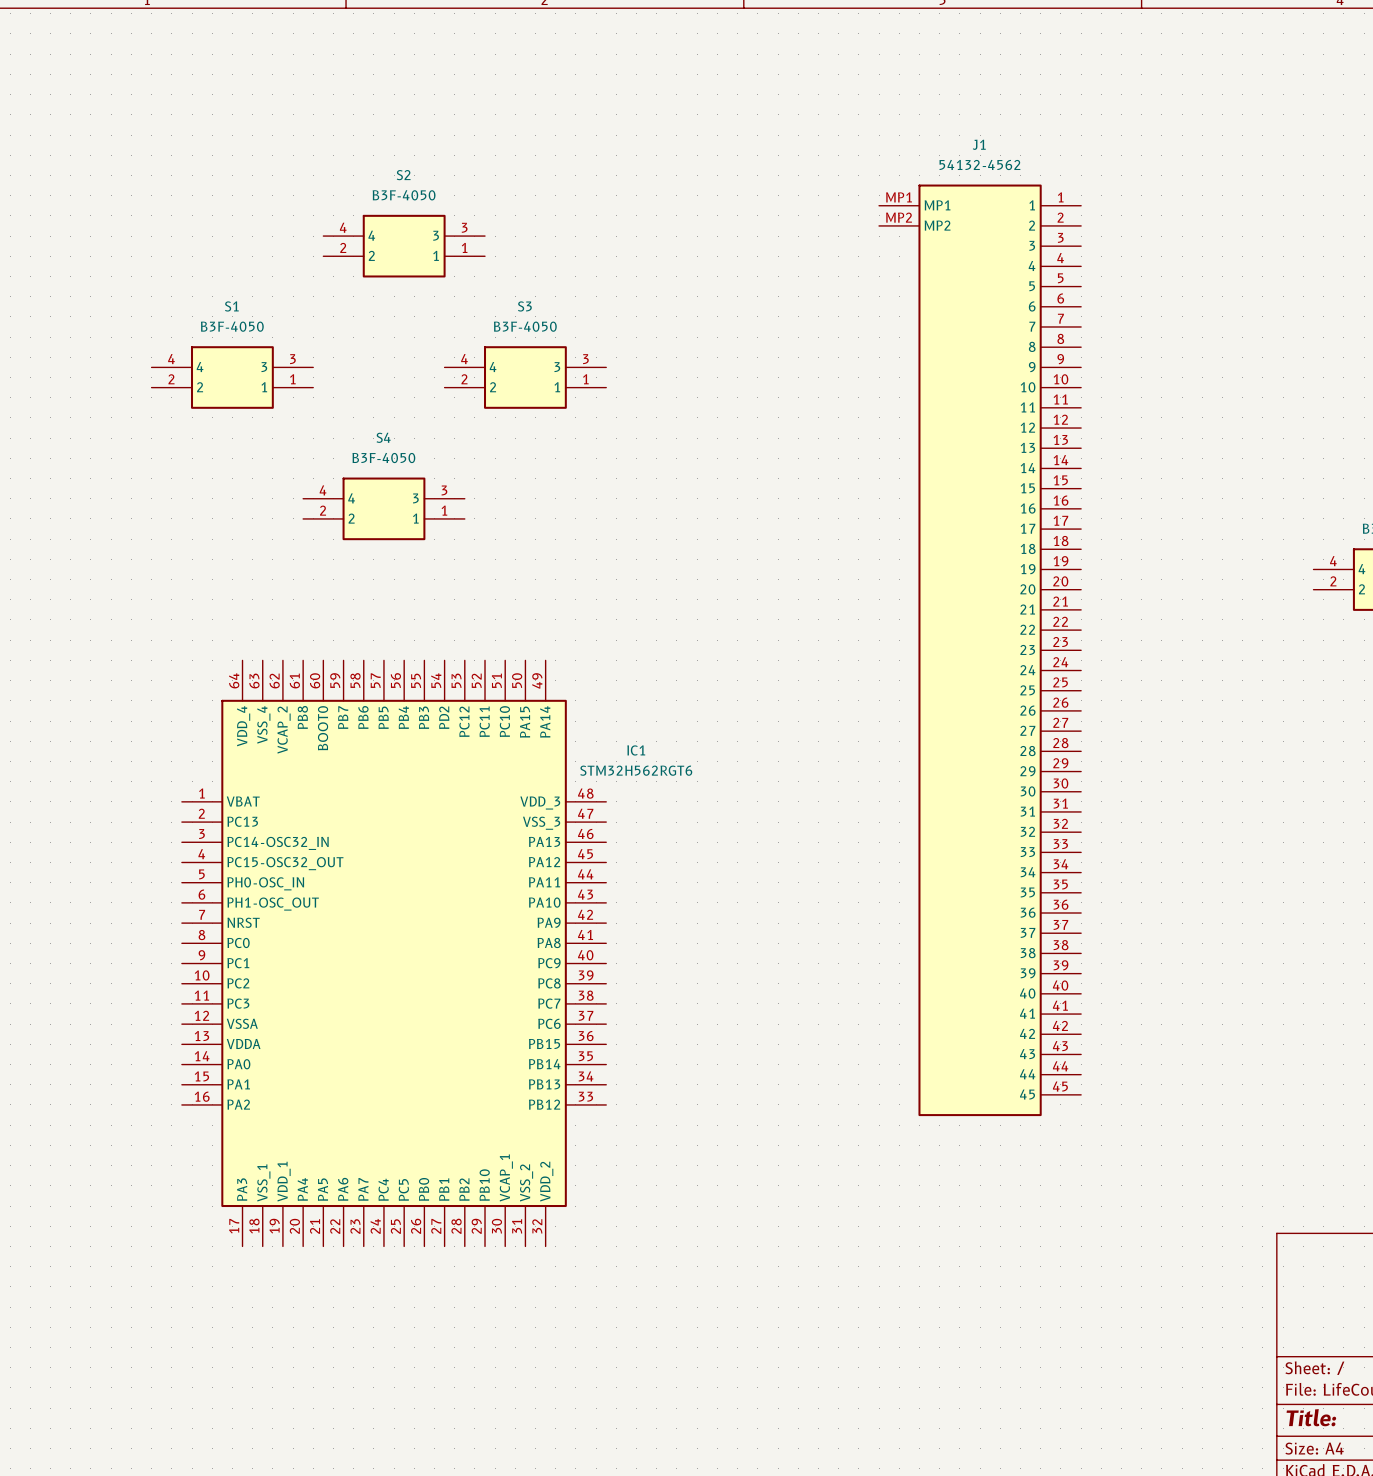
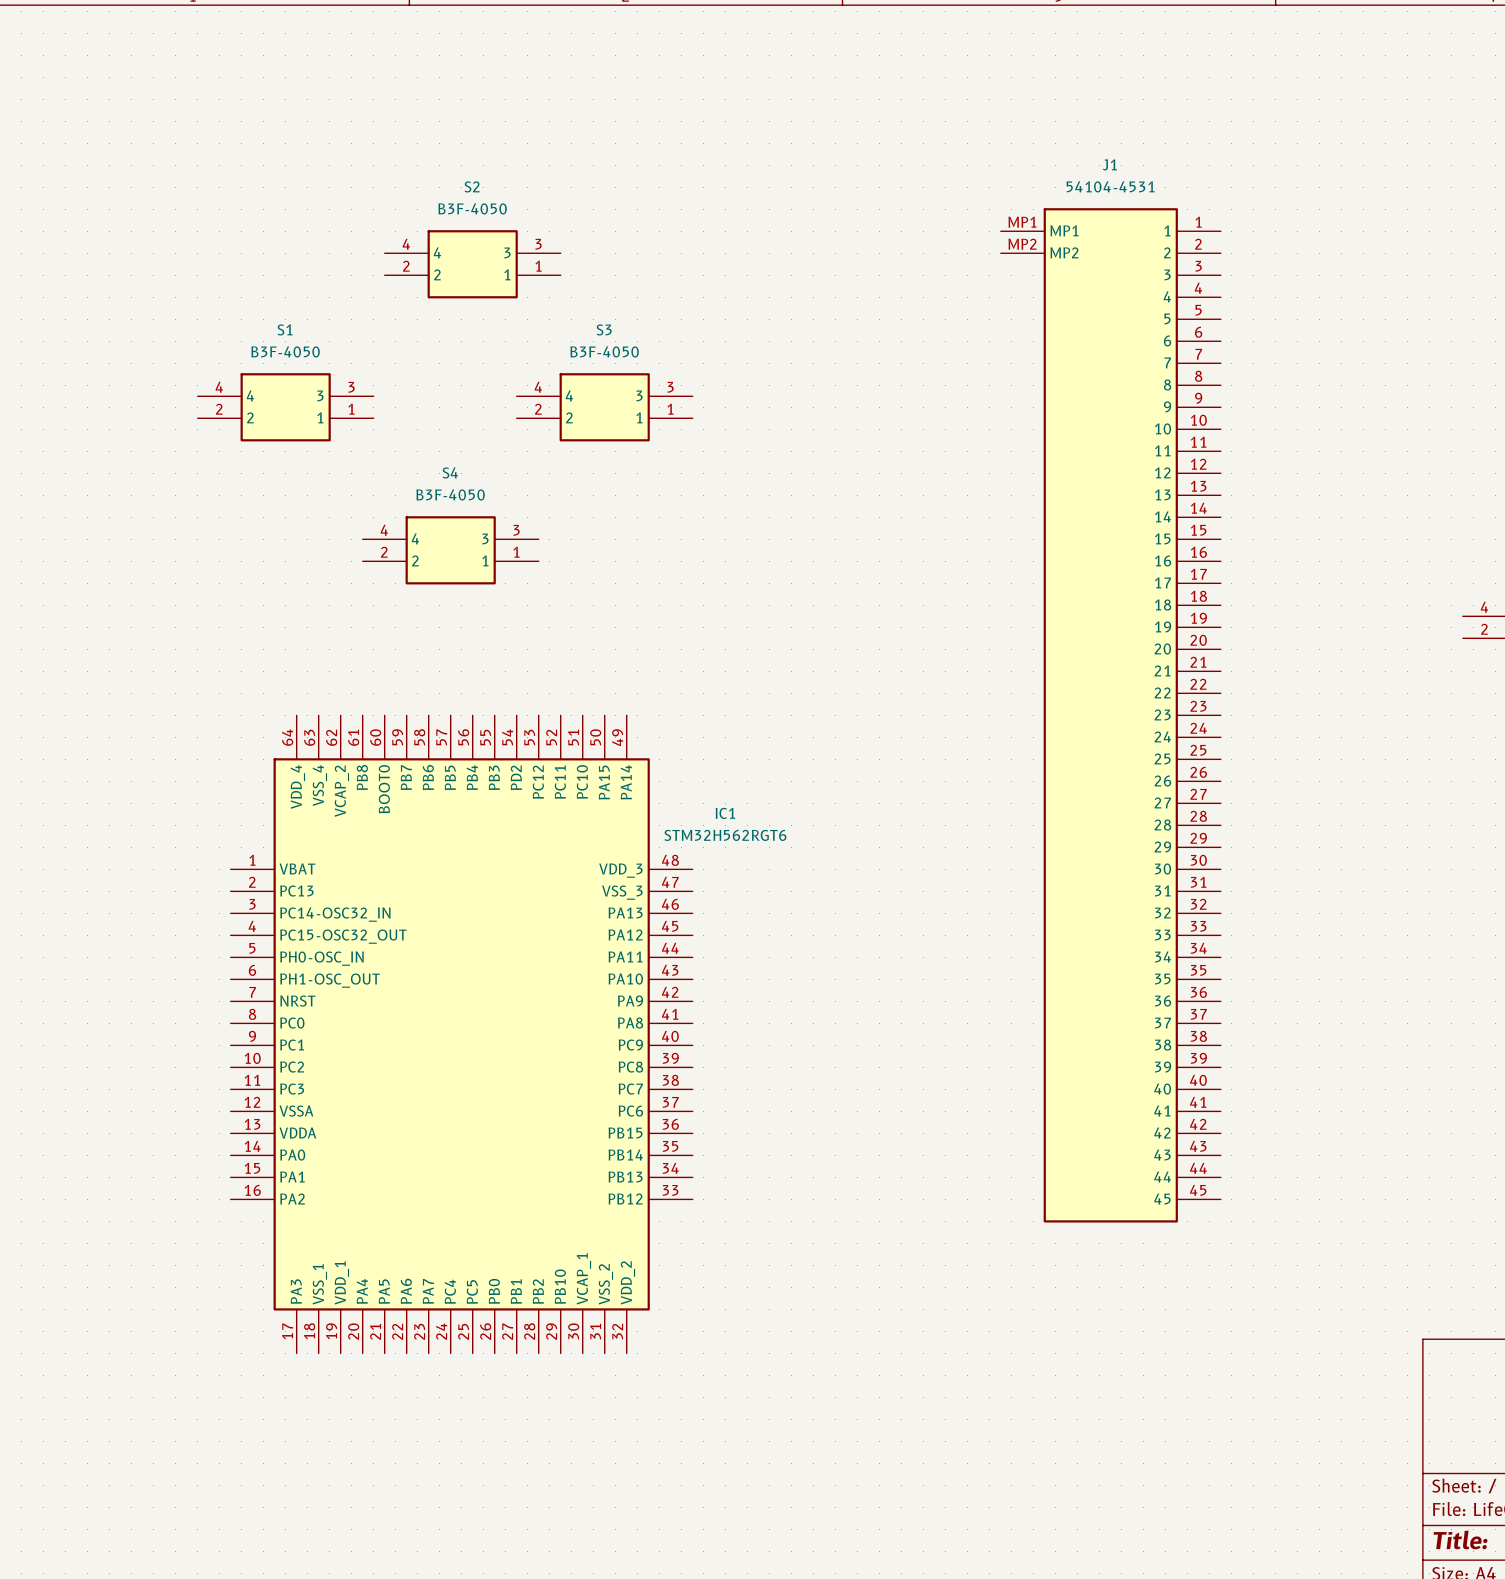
J1 value: 54132-4562 (979, 165) -> 54104-4531 (1110, 186)
J1 position: (980, 650) -> (1110, 715)

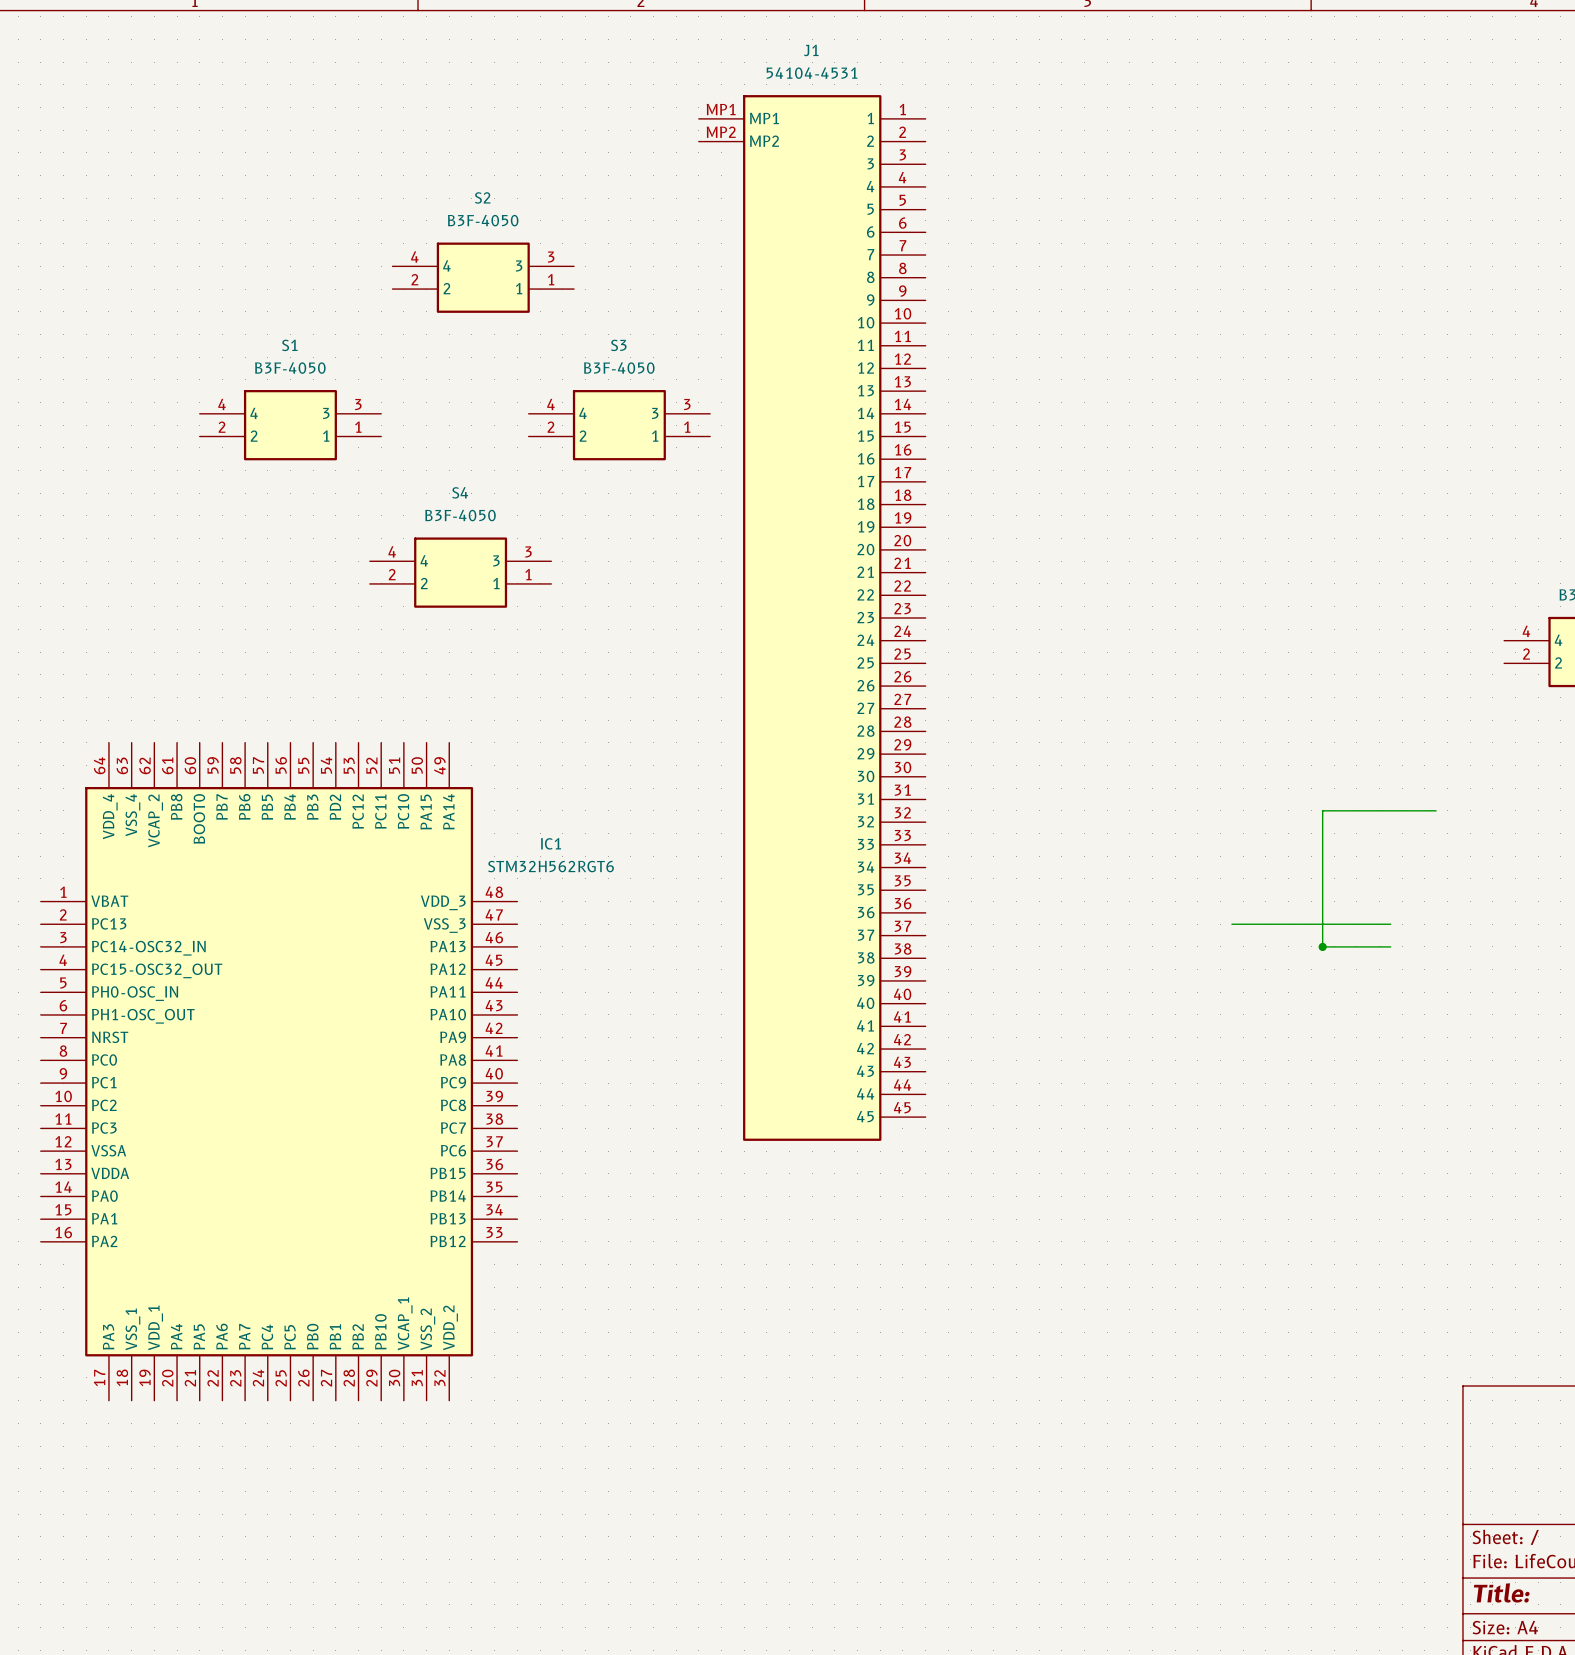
J1 position: (1110, 715) -> (812, 617)
wire: none -> (1436, 810) (1322, 810) (1322, 946) (1390, 946)
wire: none -> (1231, 924) (1390, 924)
junction: none -> (1322, 946)
IC1 position: (461, 1034) -> (279, 1071)

